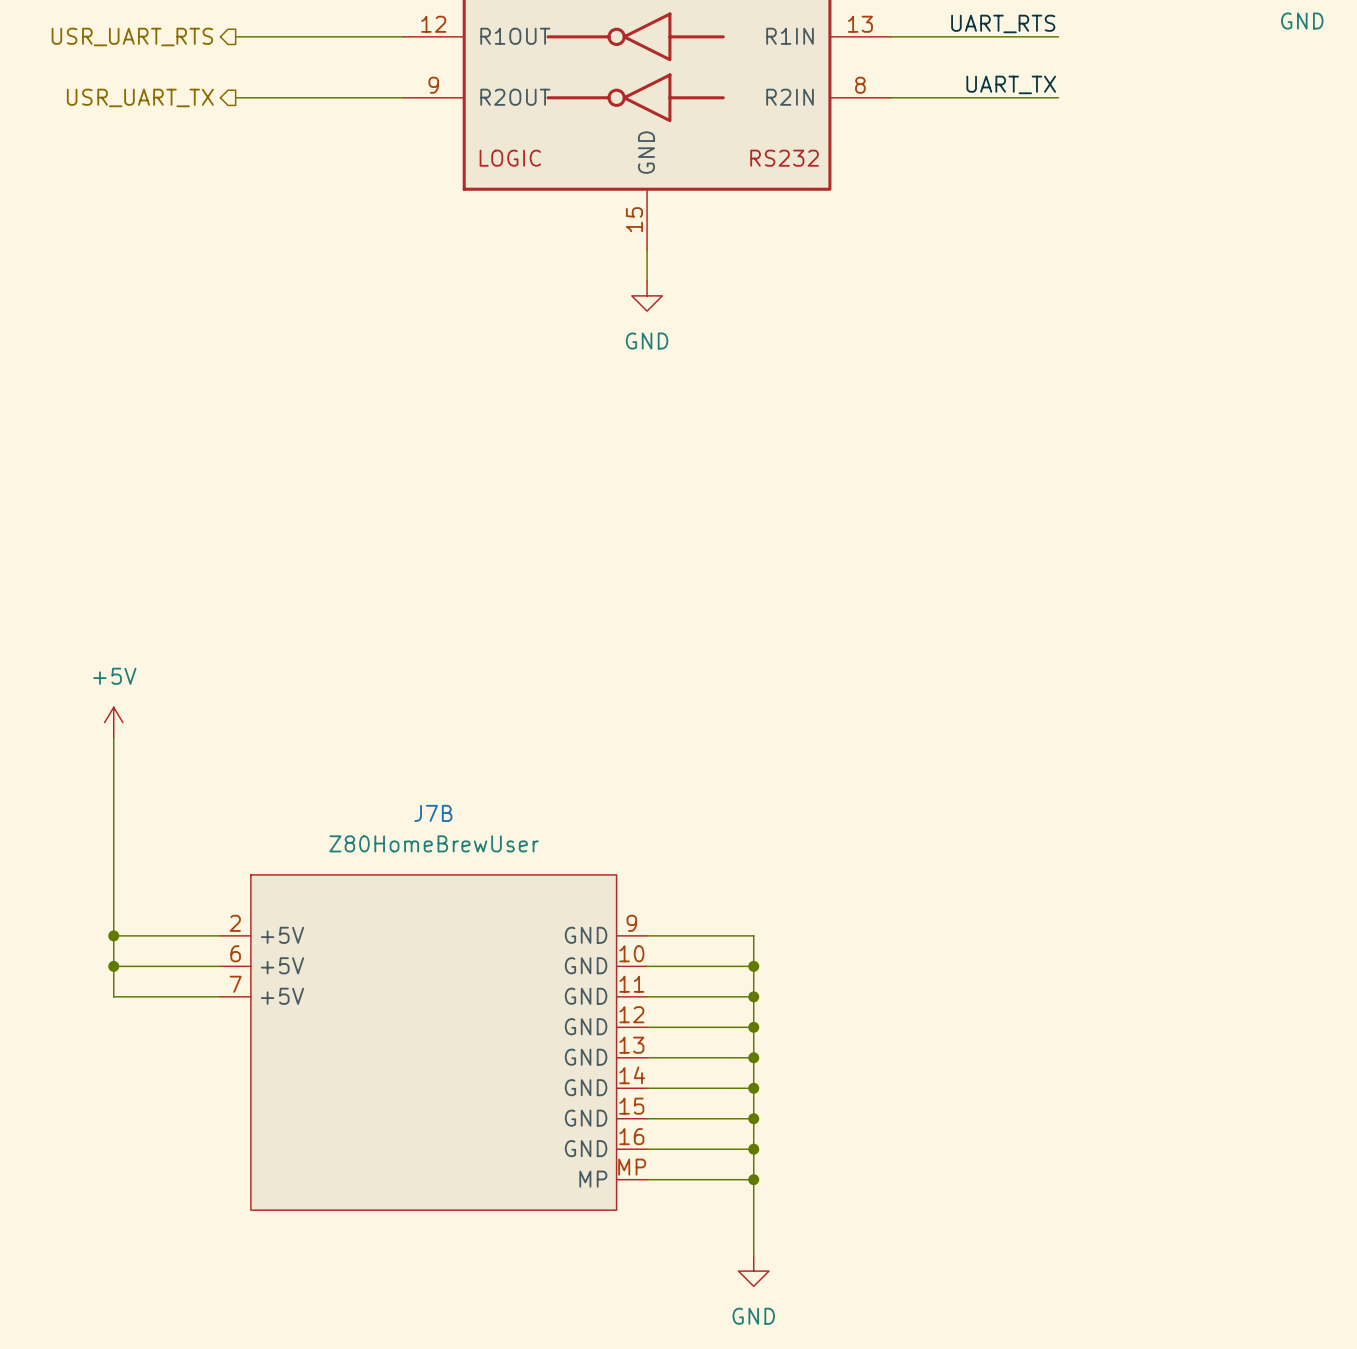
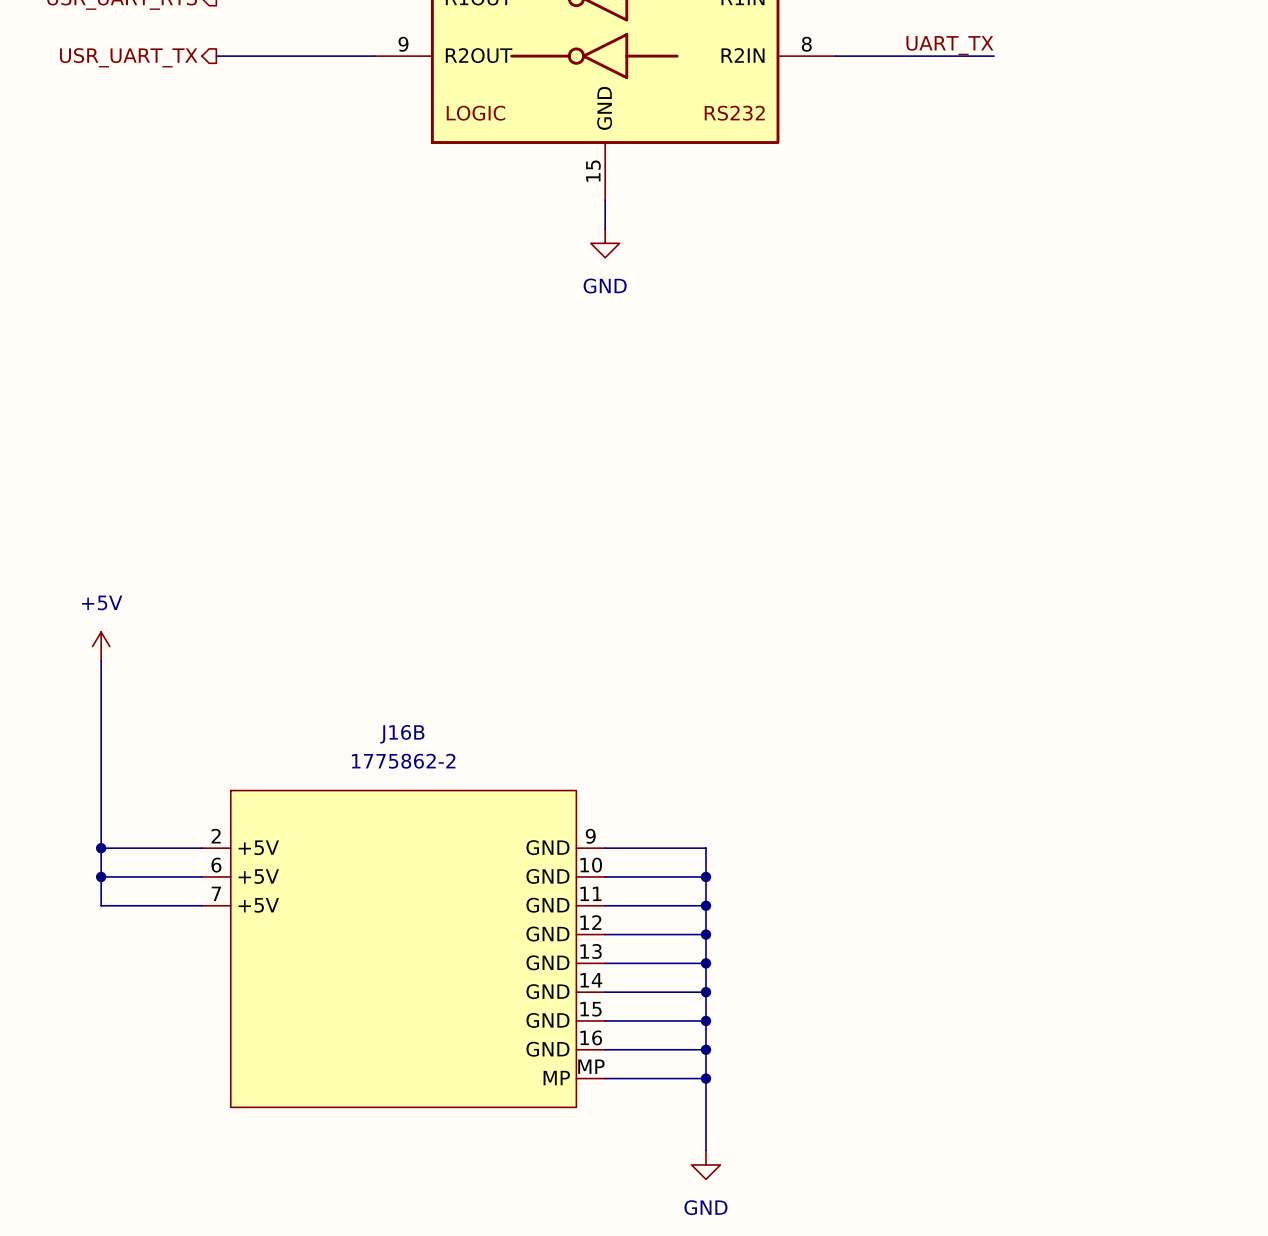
J7B name: J7B (433, 813) -> J16B (402, 734)
J7B value: Z80HomeBrewUser (434, 843) -> 1775862-2 (403, 761)

